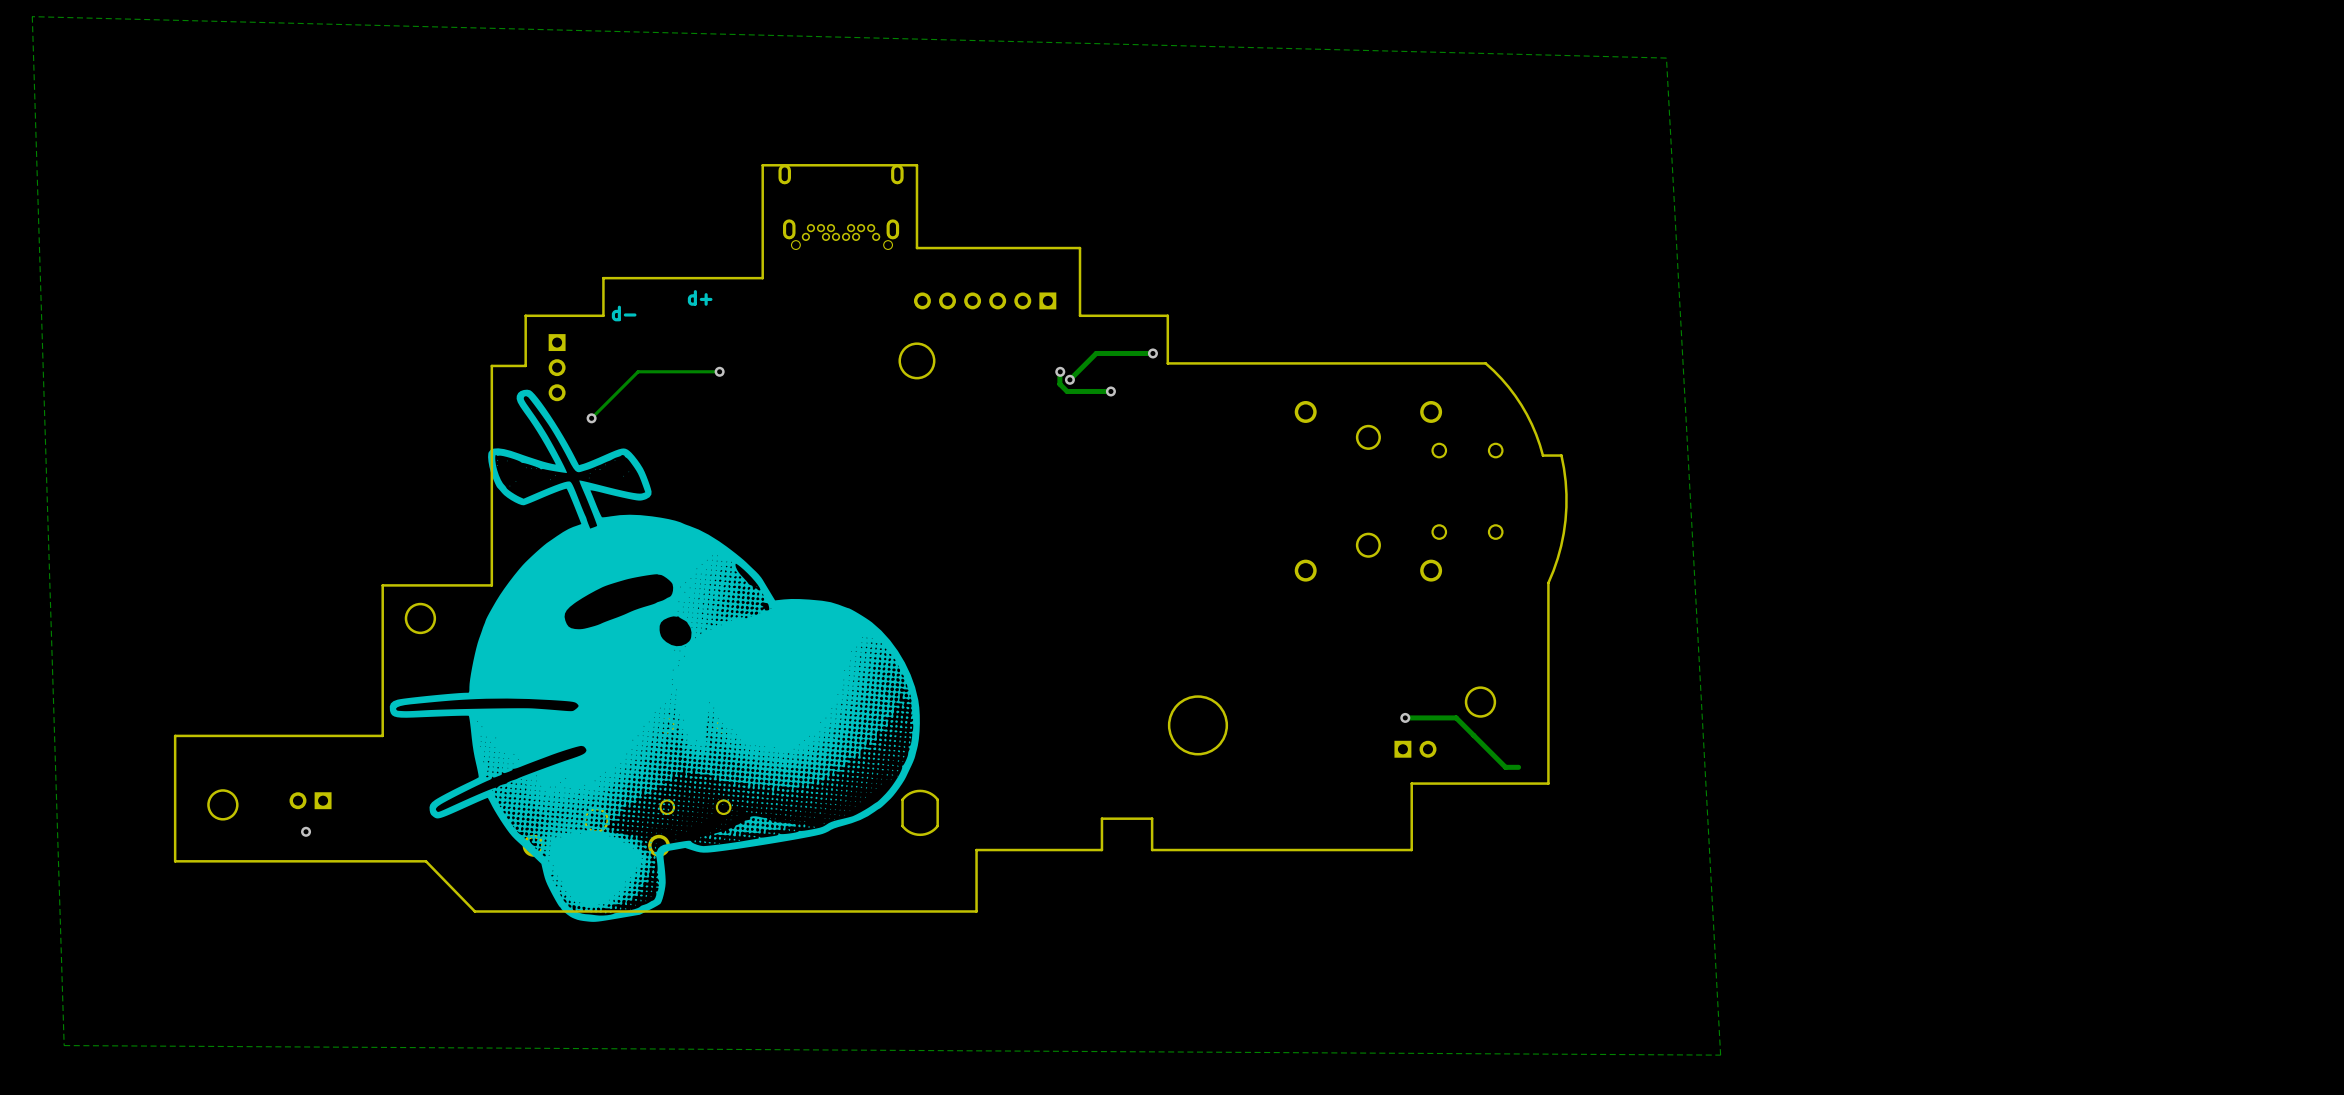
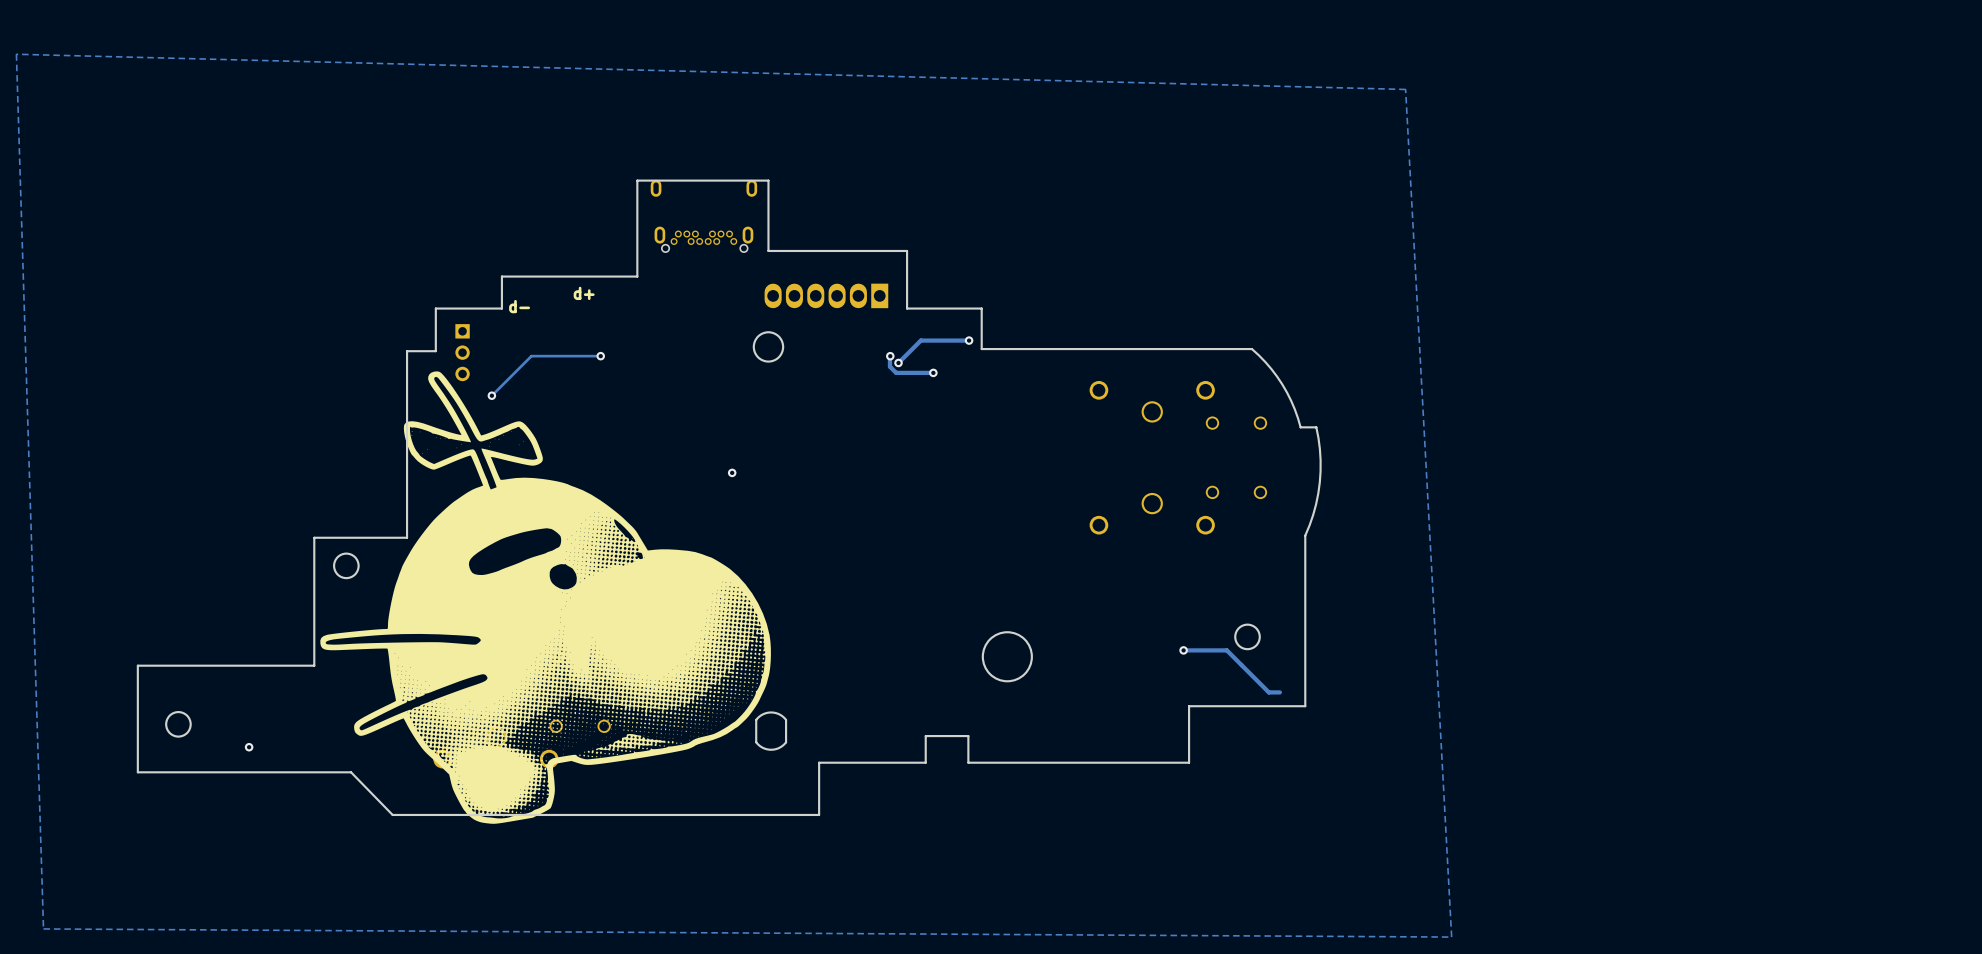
part footprint: [913, 292, 1057, 310] -> [764, 283, 889, 309]
via: none -> (732, 472)
part: (1415, 749) -> none
part: (310, 800) -> none

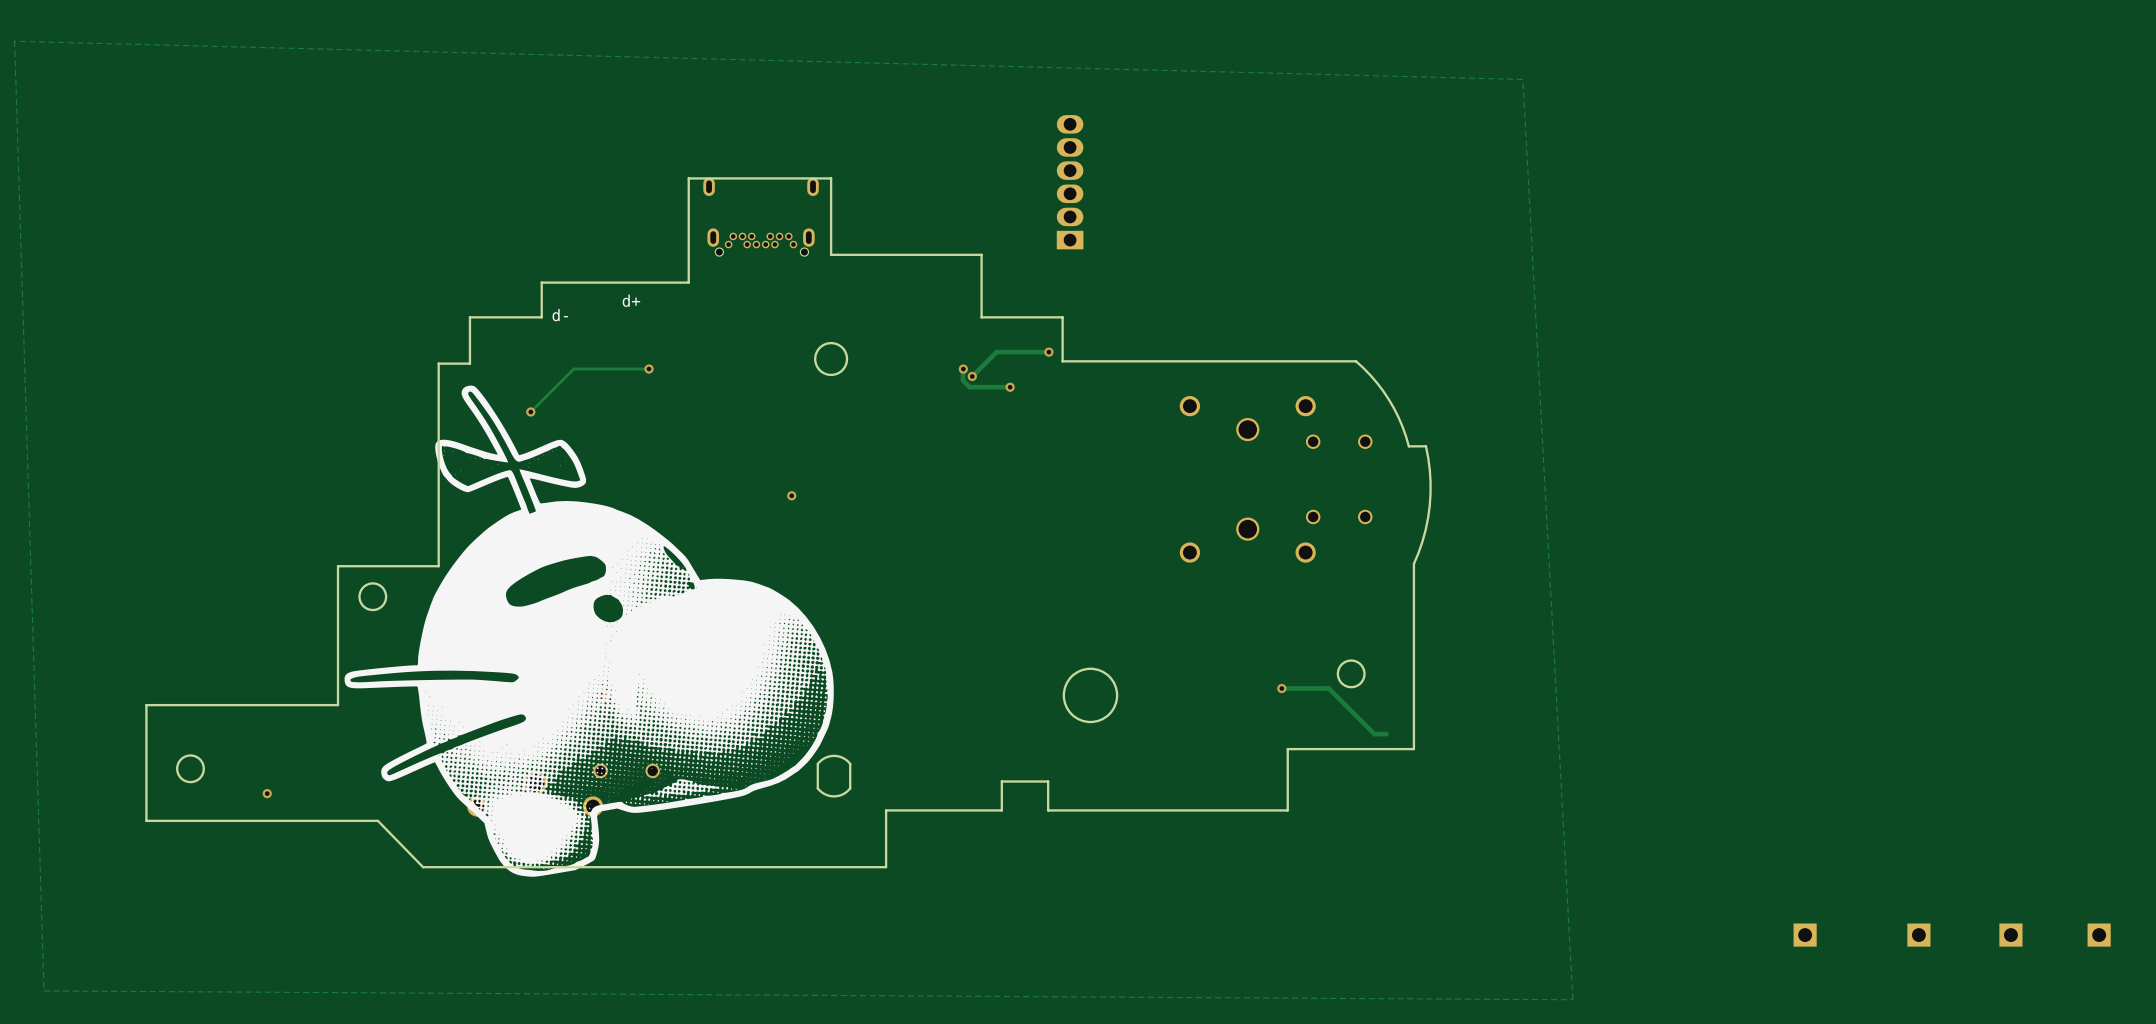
part rotation: 0° (826, 295) -> 90° clockwise (1070, 182)
part position: (826, 295) -> (1070, 182)
part: (462, 352) -> none
part: none -> (1805, 935)
part: none -> (1918, 935)
part: none -> (2010, 935)
part: none -> (2099, 935)

